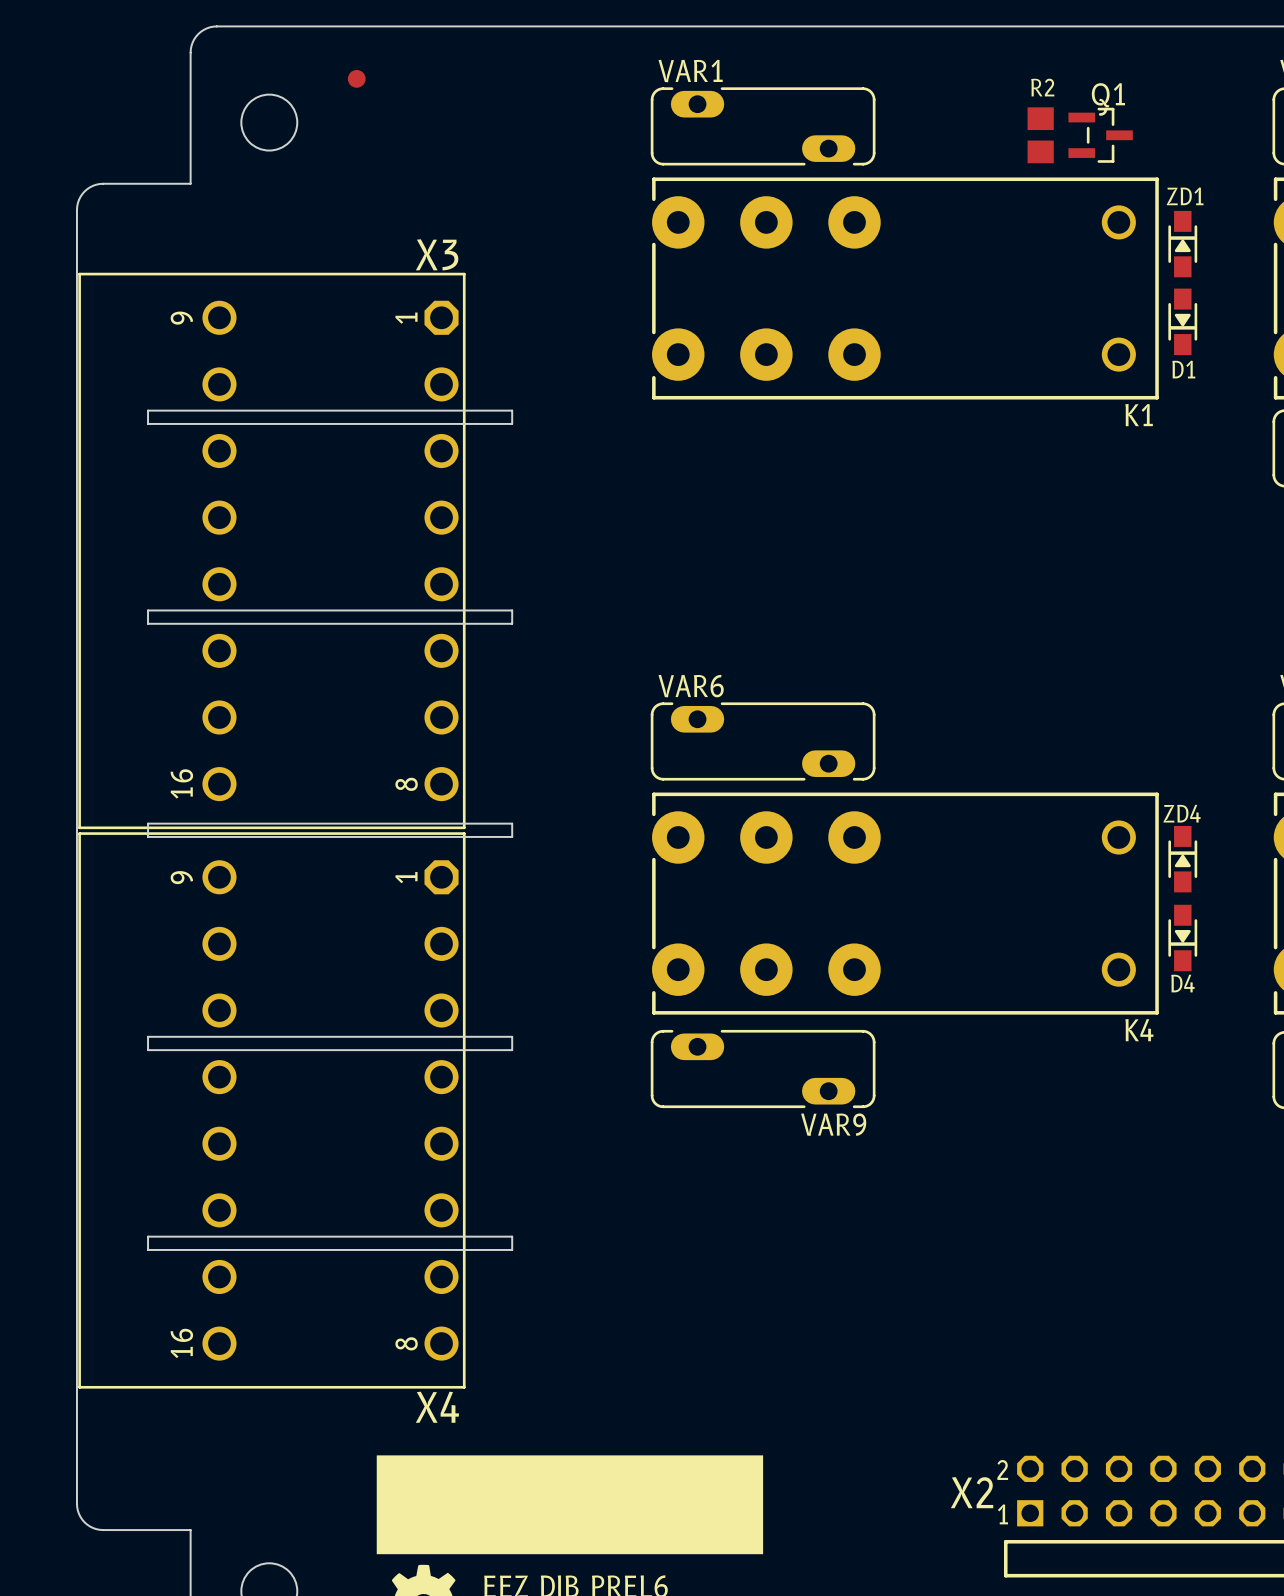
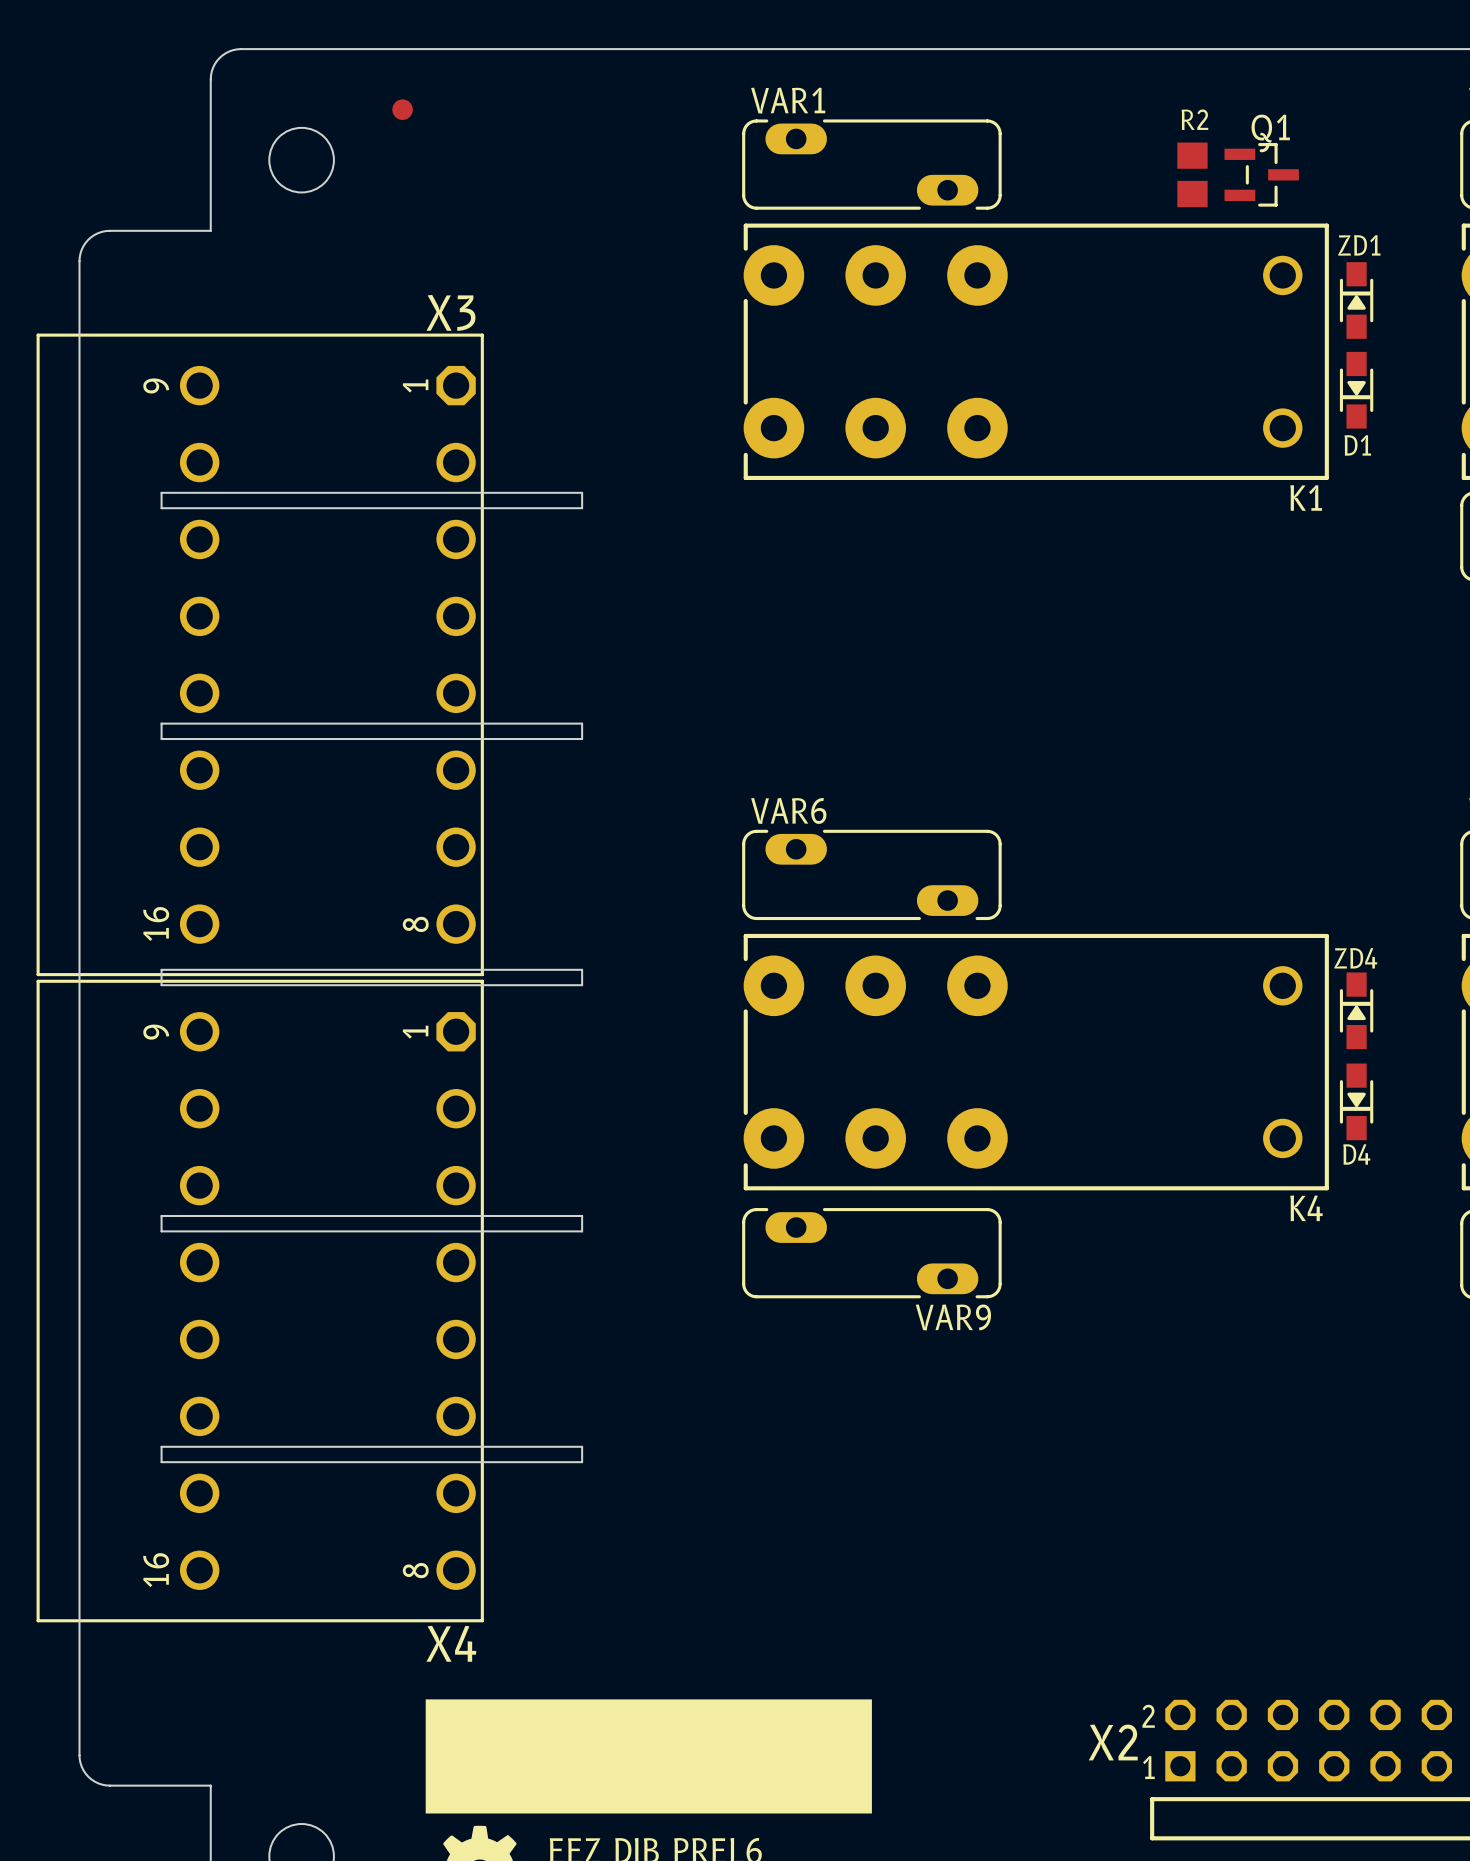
X3 position: (271, 550) -> (260, 654)
X4 position: (271, 1110) -> (260, 1301)

